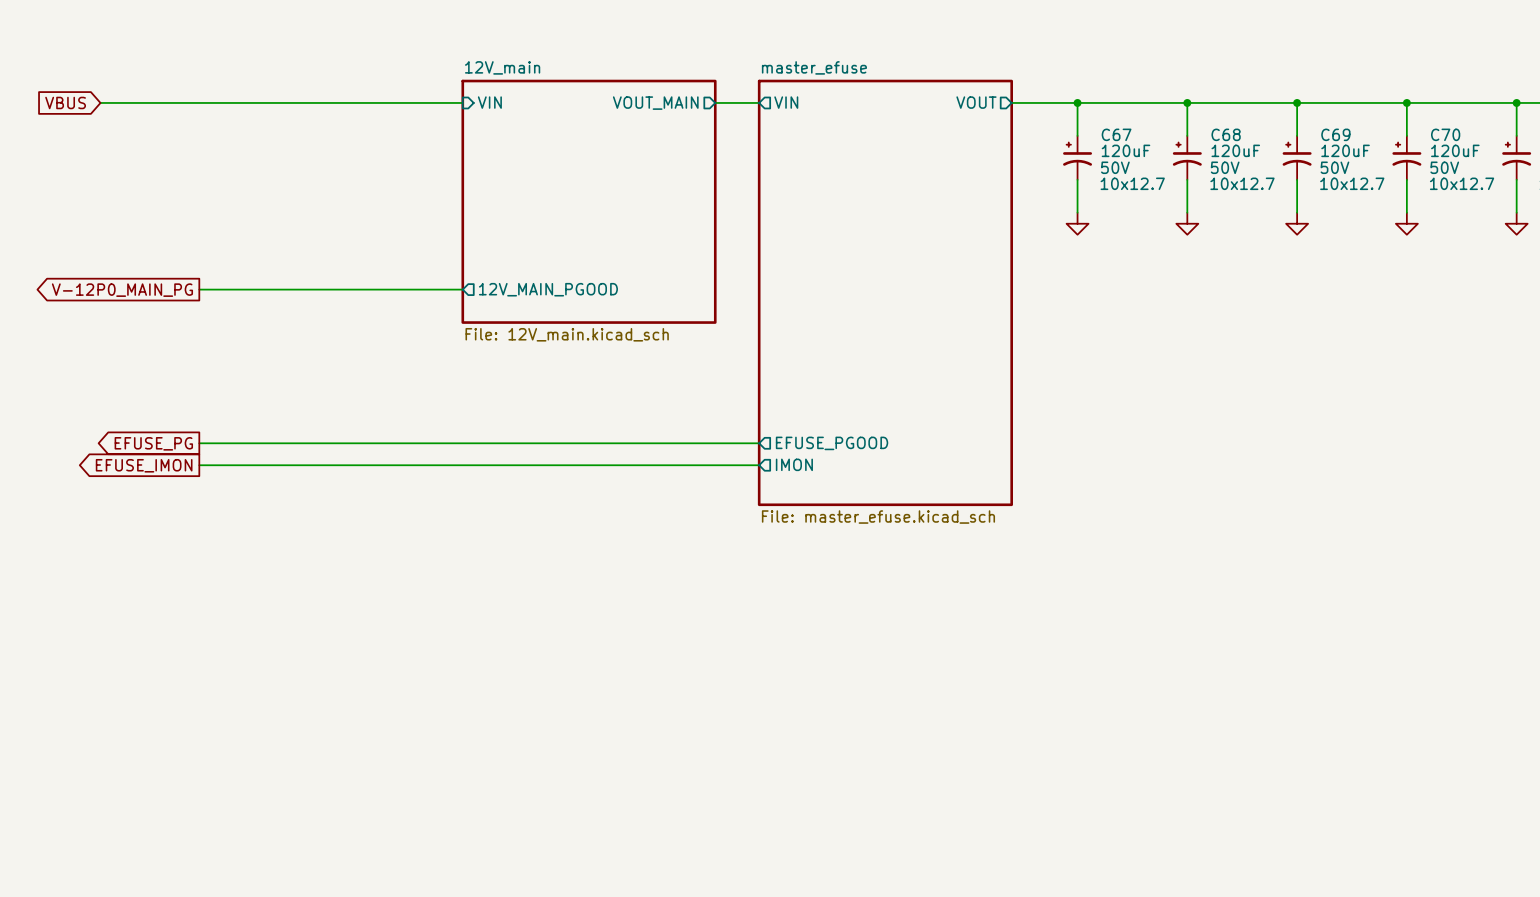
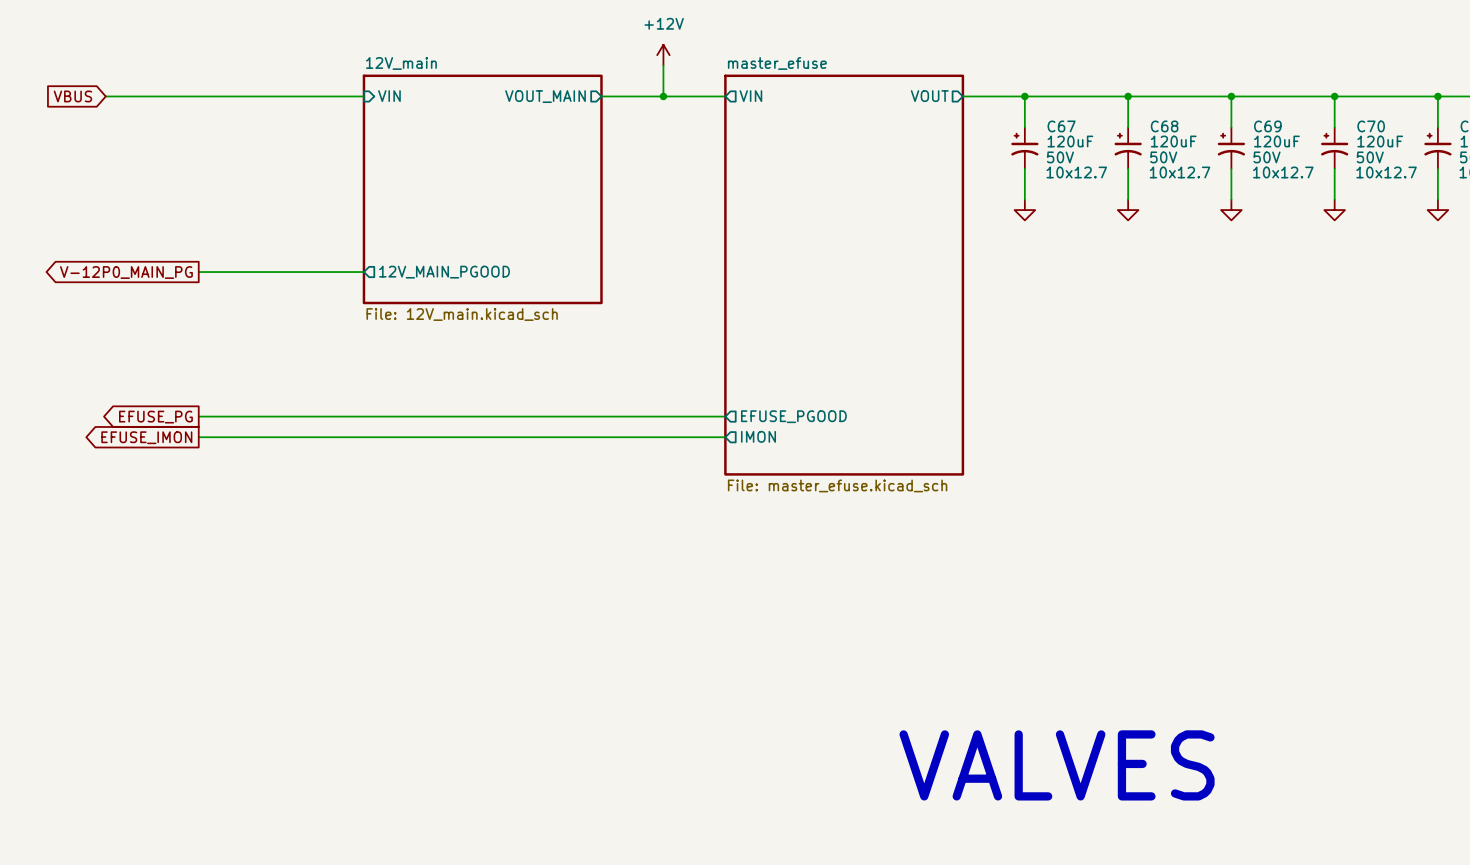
power symbol: none -> +12V (663, 55)
wire: none -> (663, 65) (663, 96)
wire: (374, 102) (462, 102) -> none
sheet pin position: VIN (489, 102) -> VIN (389, 96)
wire: none -> (601, 96) (684, 96)
junction: none -> (663, 96)
sheet pin position: VOUT_MAIN (655, 103) -> VOUT_MAIN (545, 96)
sheet 12V_main position: (589, 201) -> (482, 189)
wire: (374, 289) (462, 289) -> none
sheet pin position: 12V_MAIN_PGOOD (548, 289) -> 12V_MAIN_PGOOD (444, 272)
text: none -> VALVES (1057, 765)

